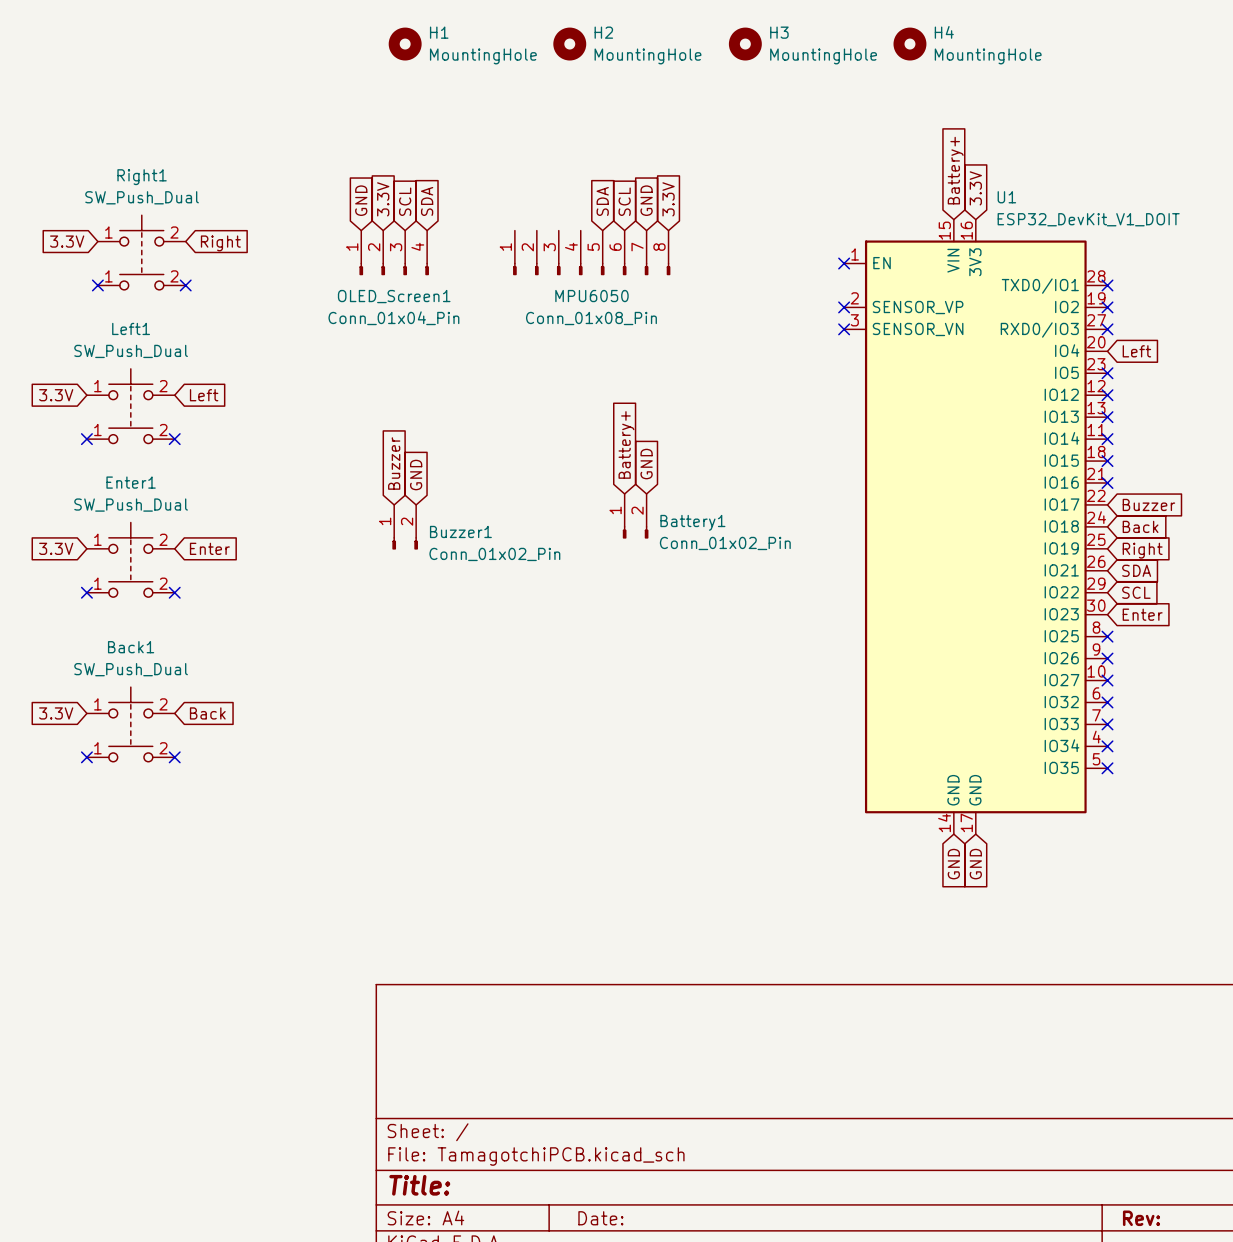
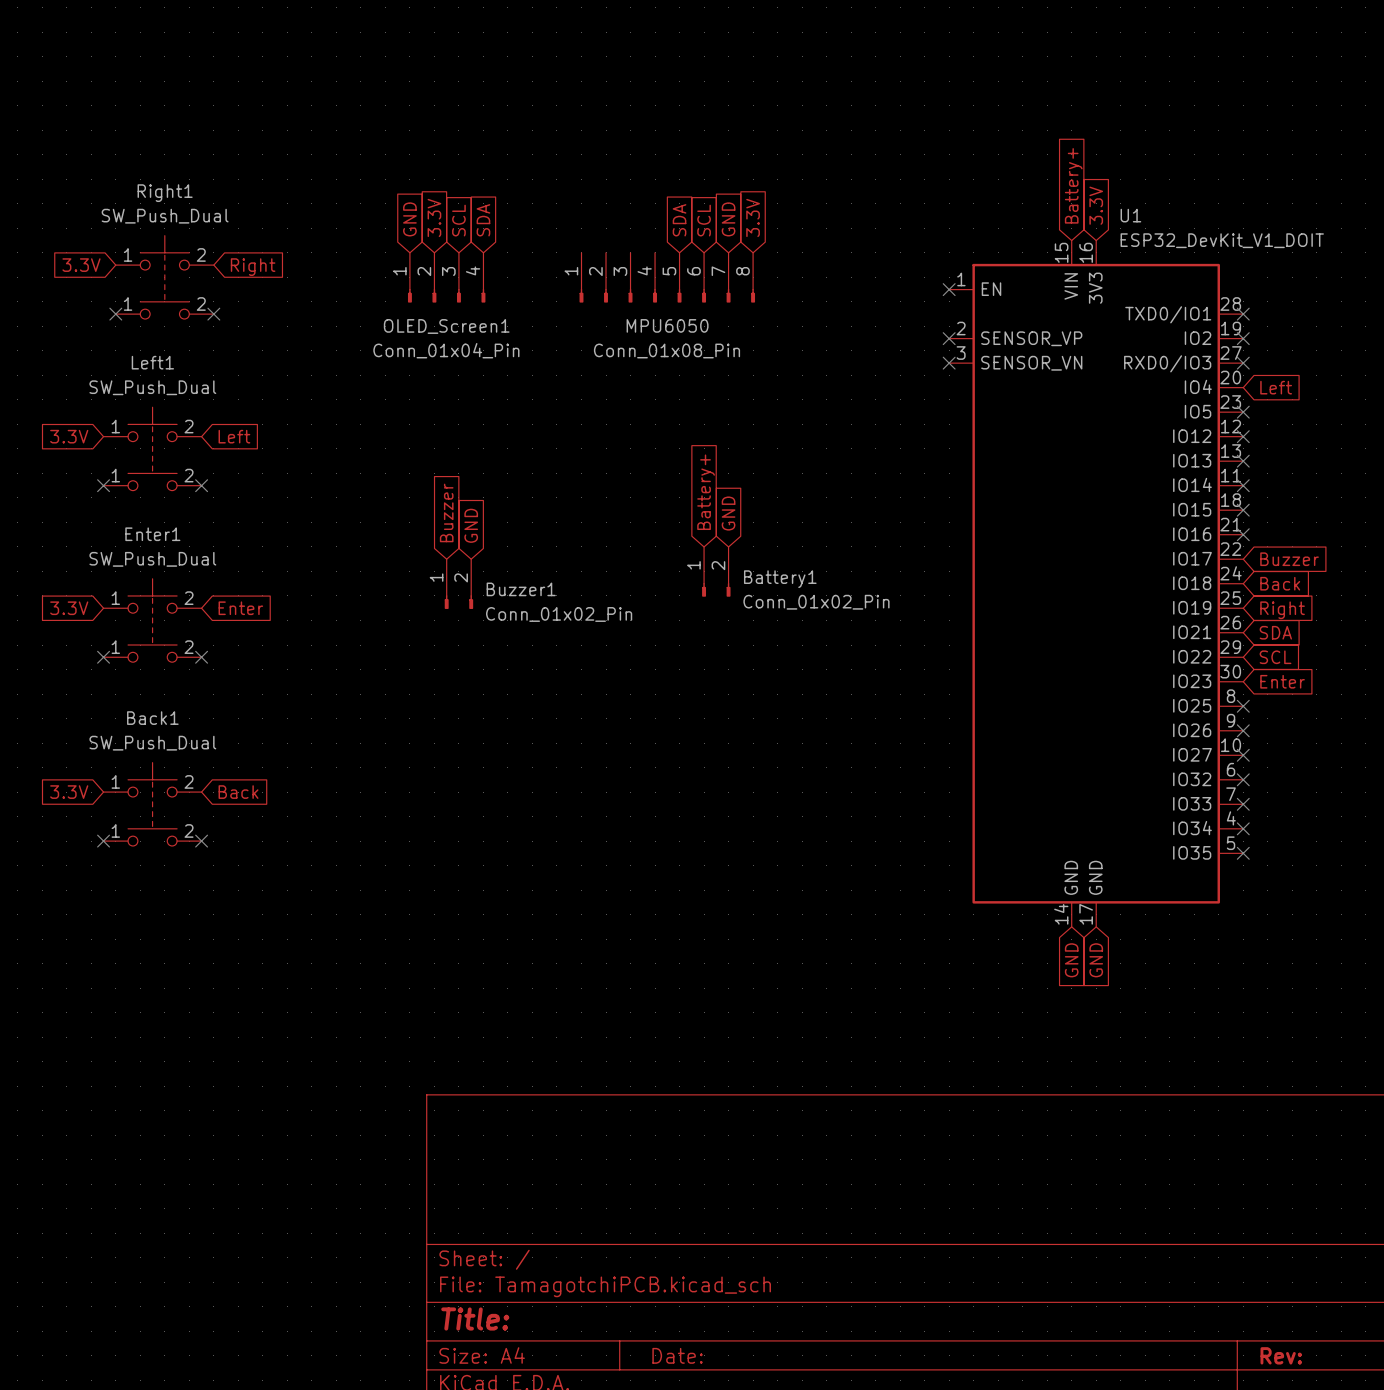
H1: MountingHole (405, 44) -> none
H2: MountingHole (569, 44) -> none
H3: MountingHole (745, 44) -> none
H4: MountingHole (909, 44) -> none

